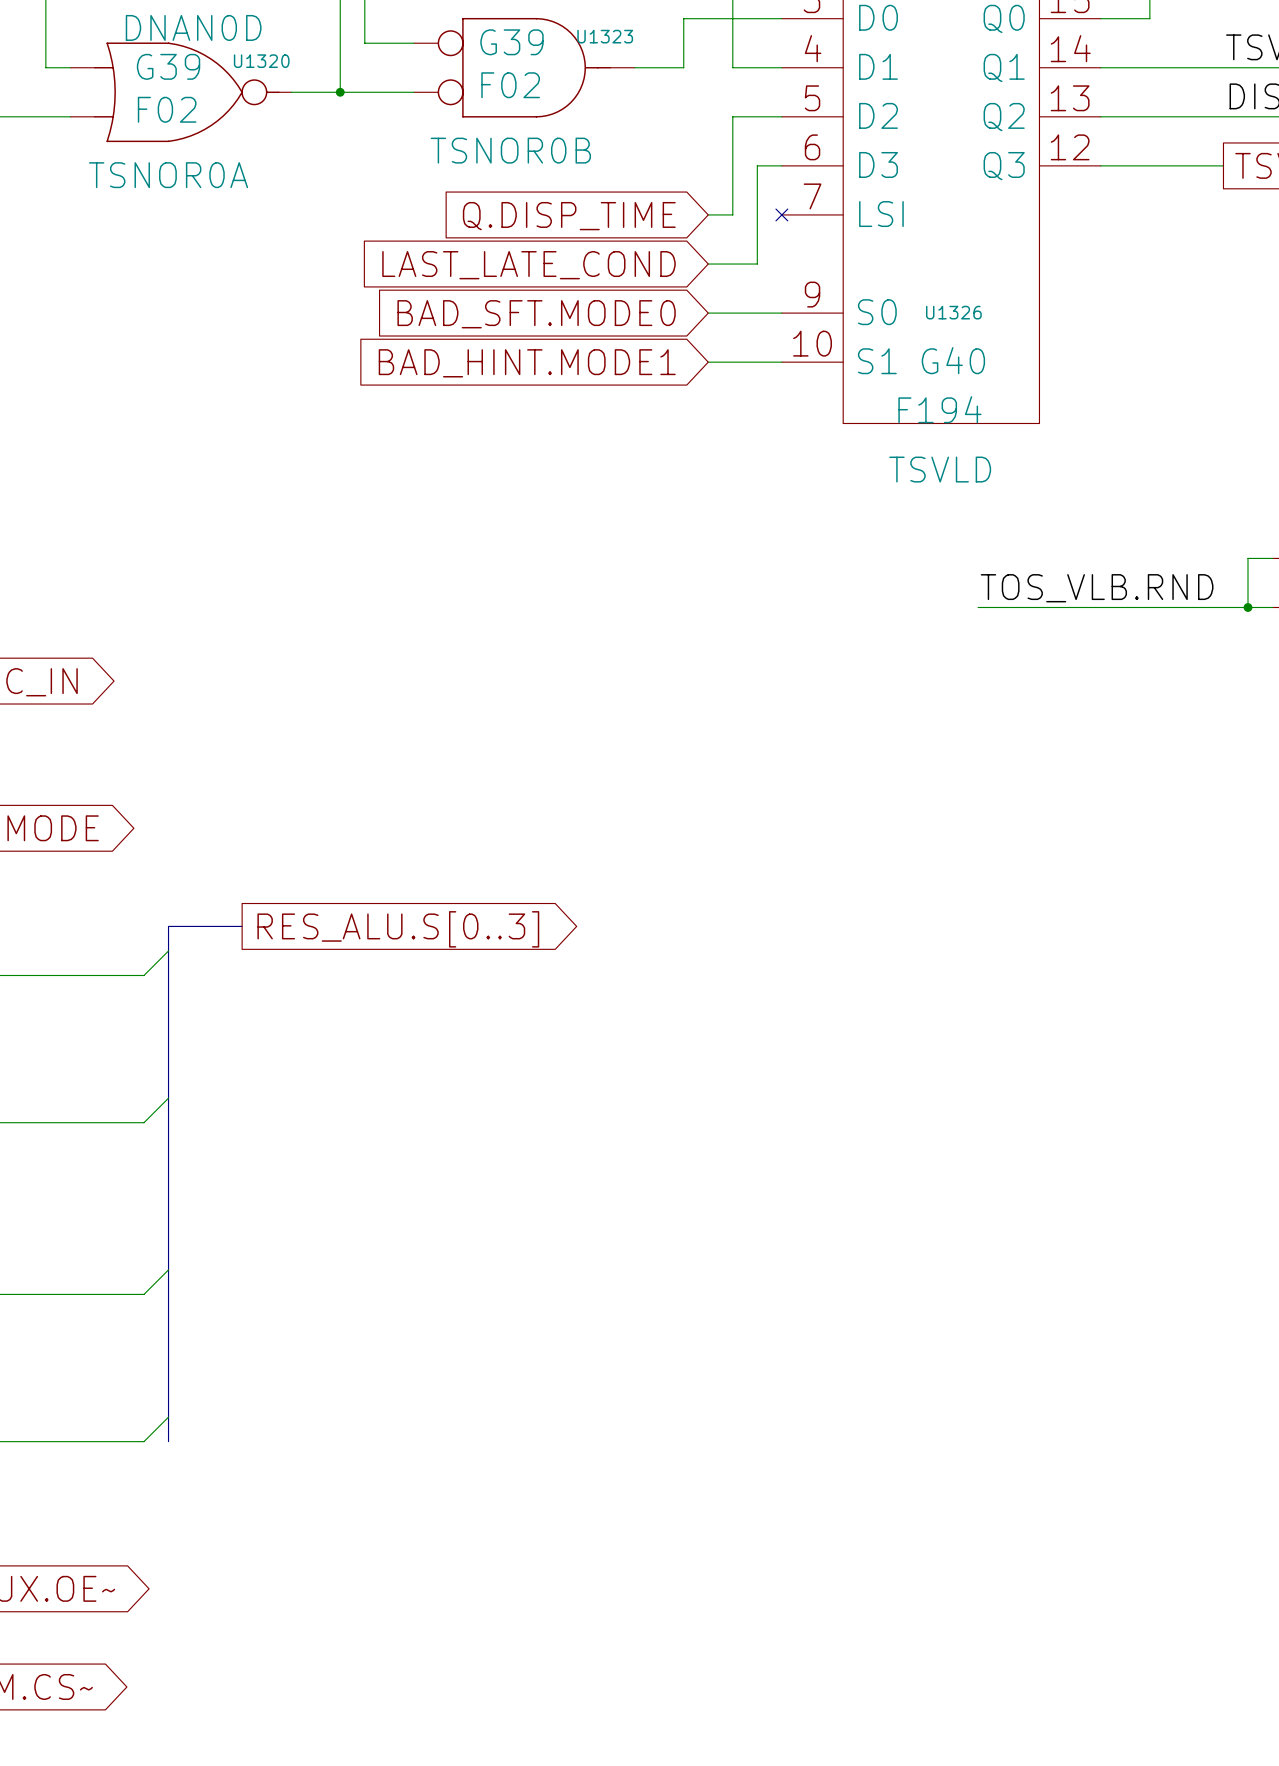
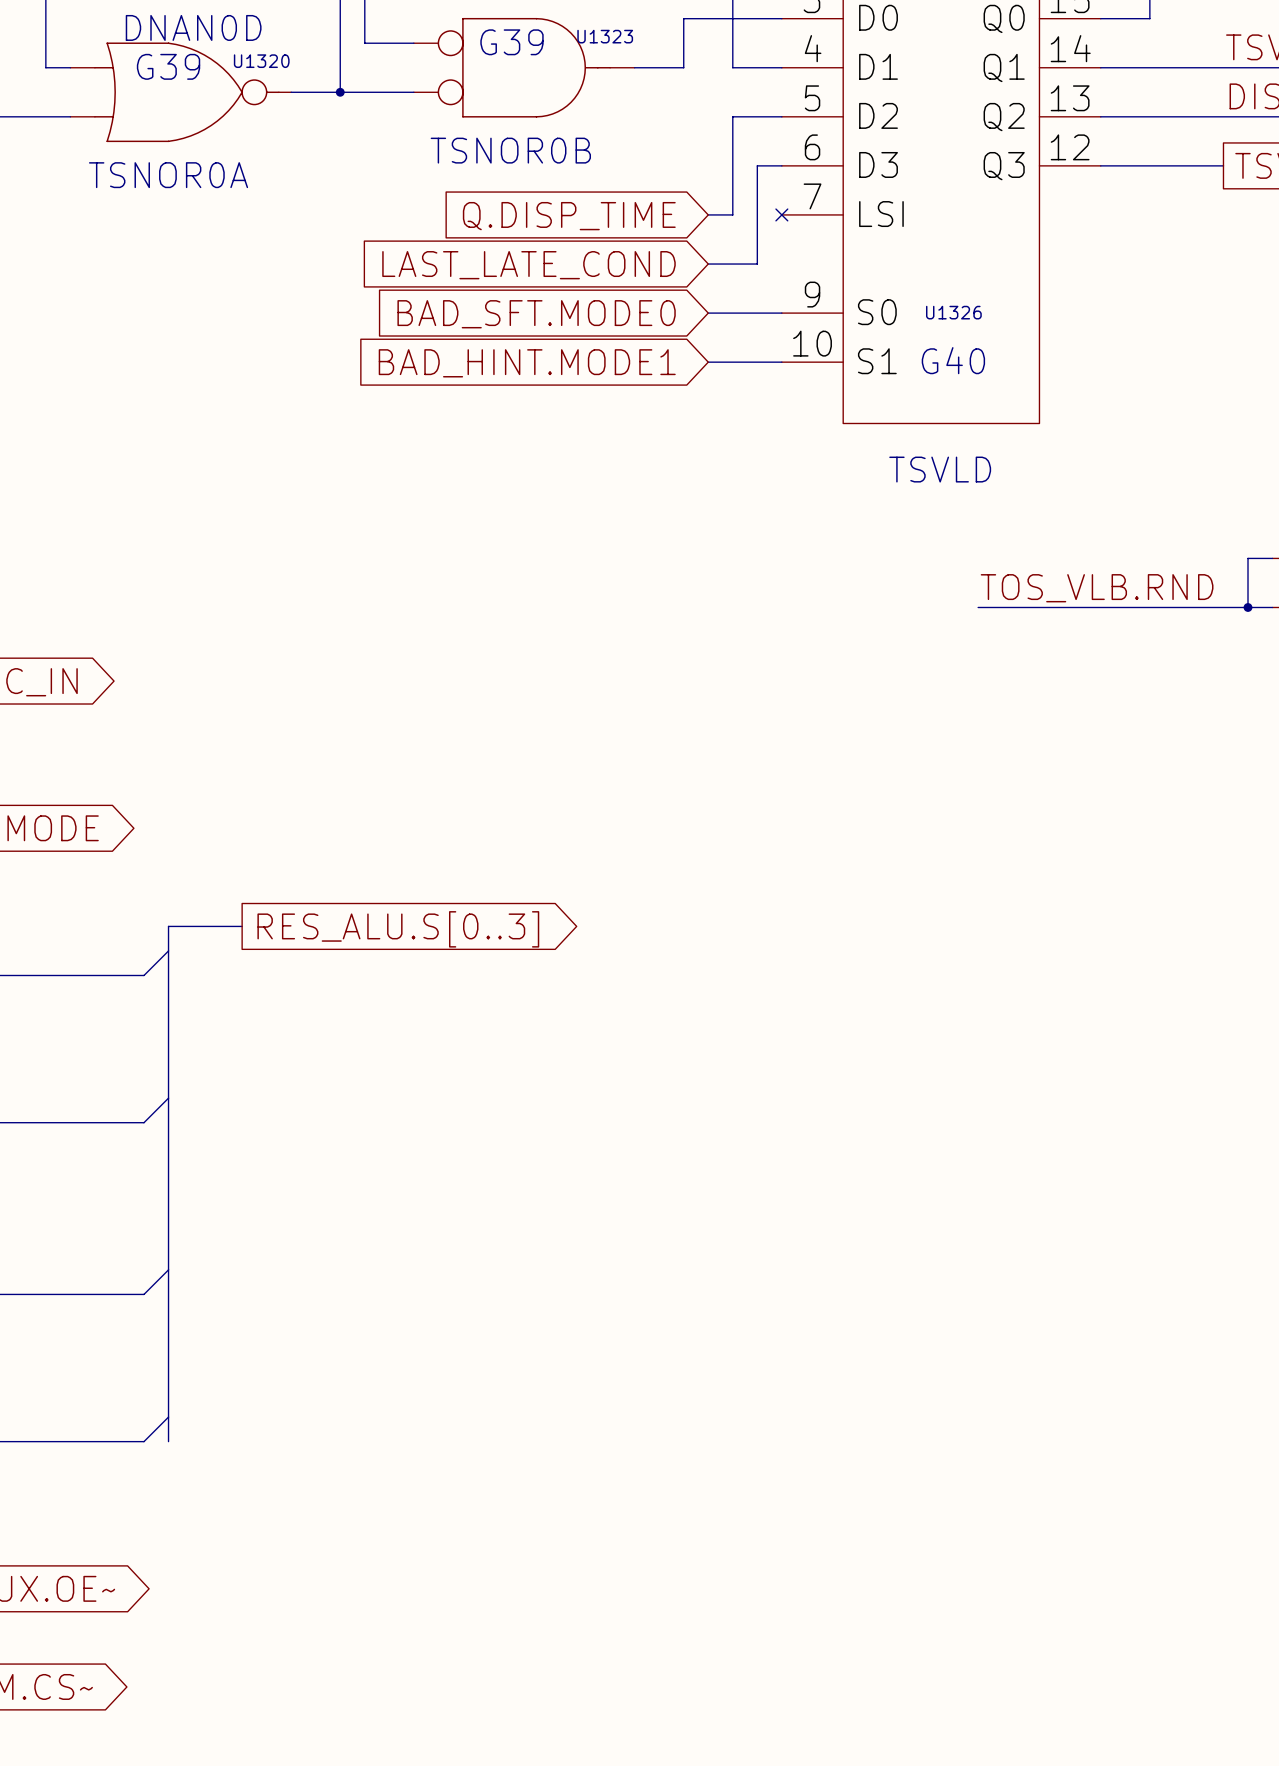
U1323 value: F02 (510, 85) -> none
U1320 value: F02 (167, 109) -> none
U1326 value: F194 (939, 409) -> none

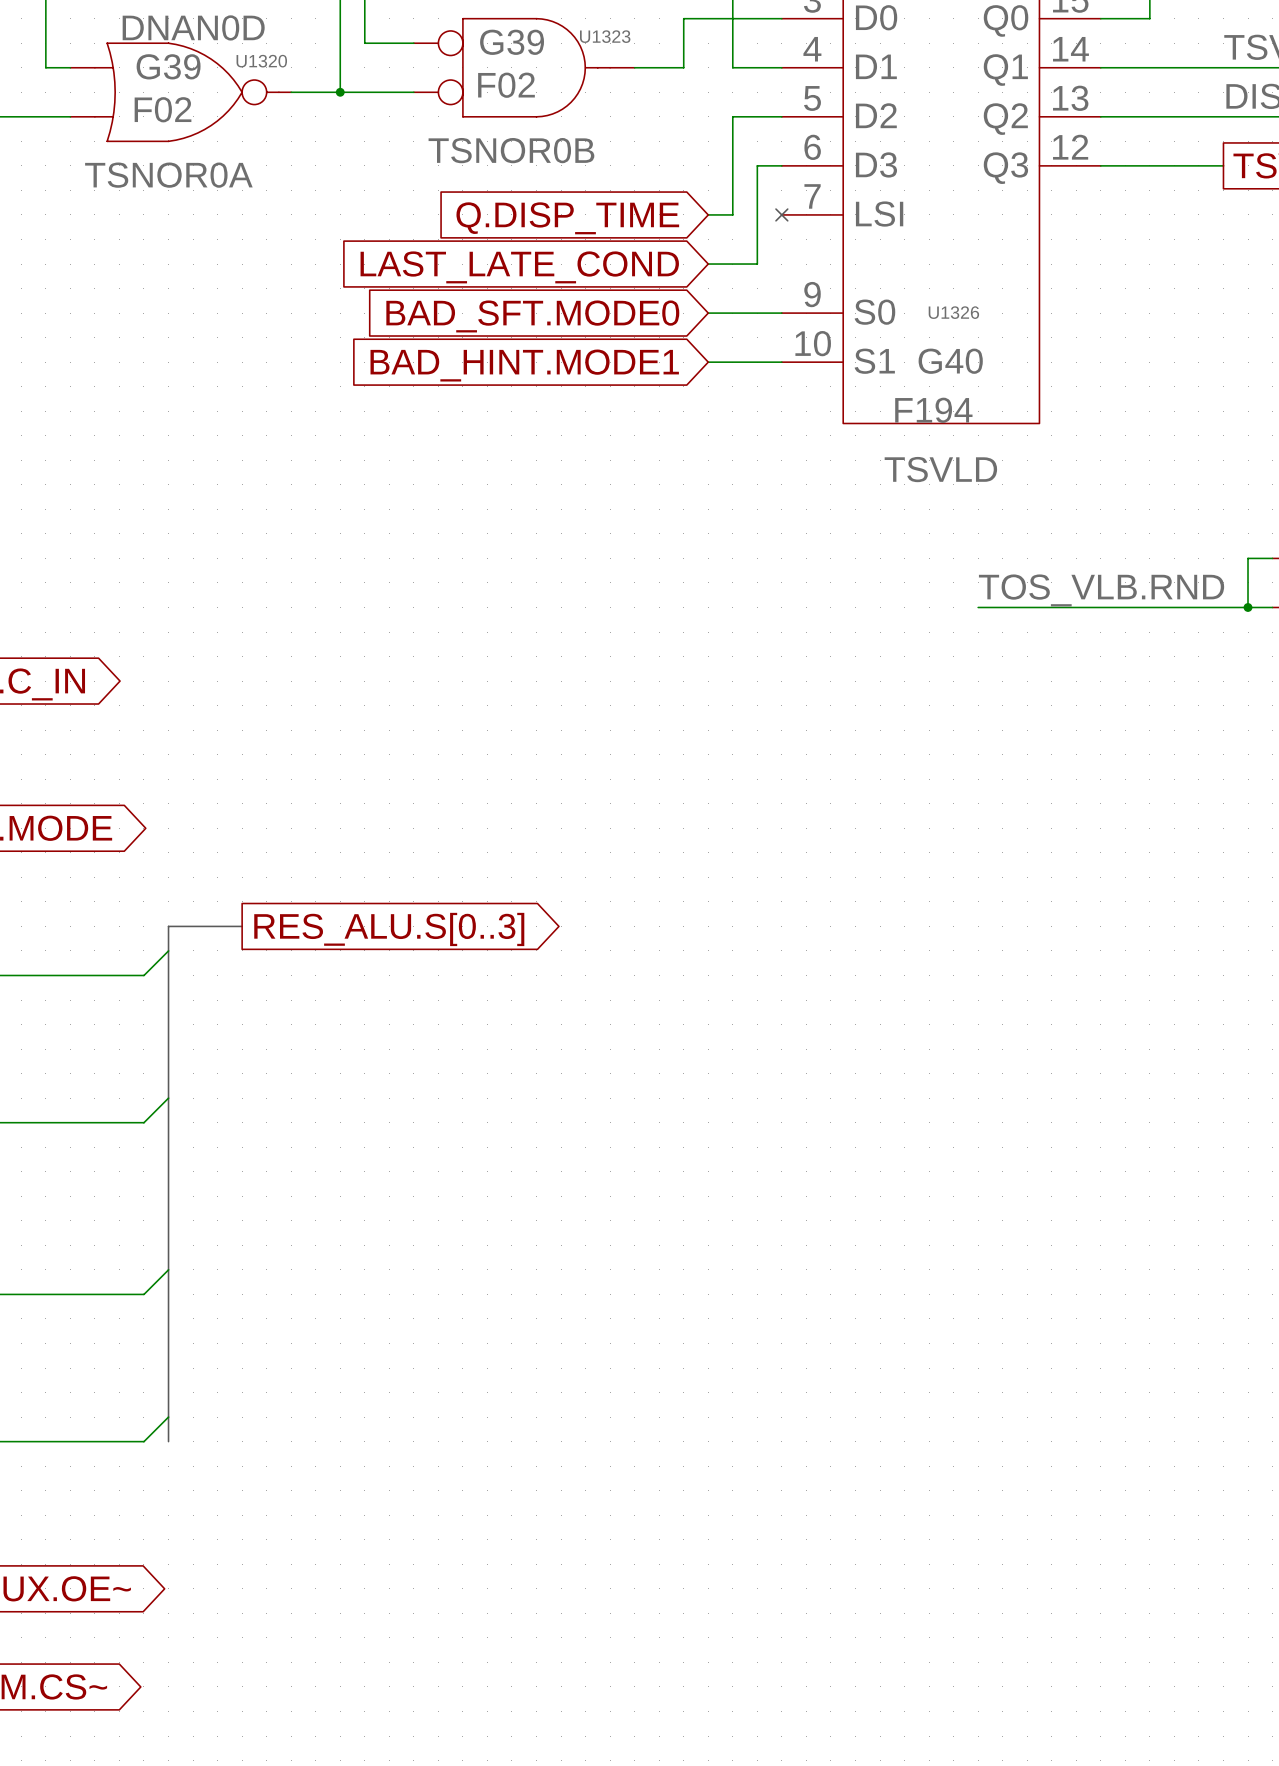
U1323 value: none -> F02 (506, 85)
U1320 value: none -> F02 (163, 109)
U1326 value: none -> F194 (933, 410)

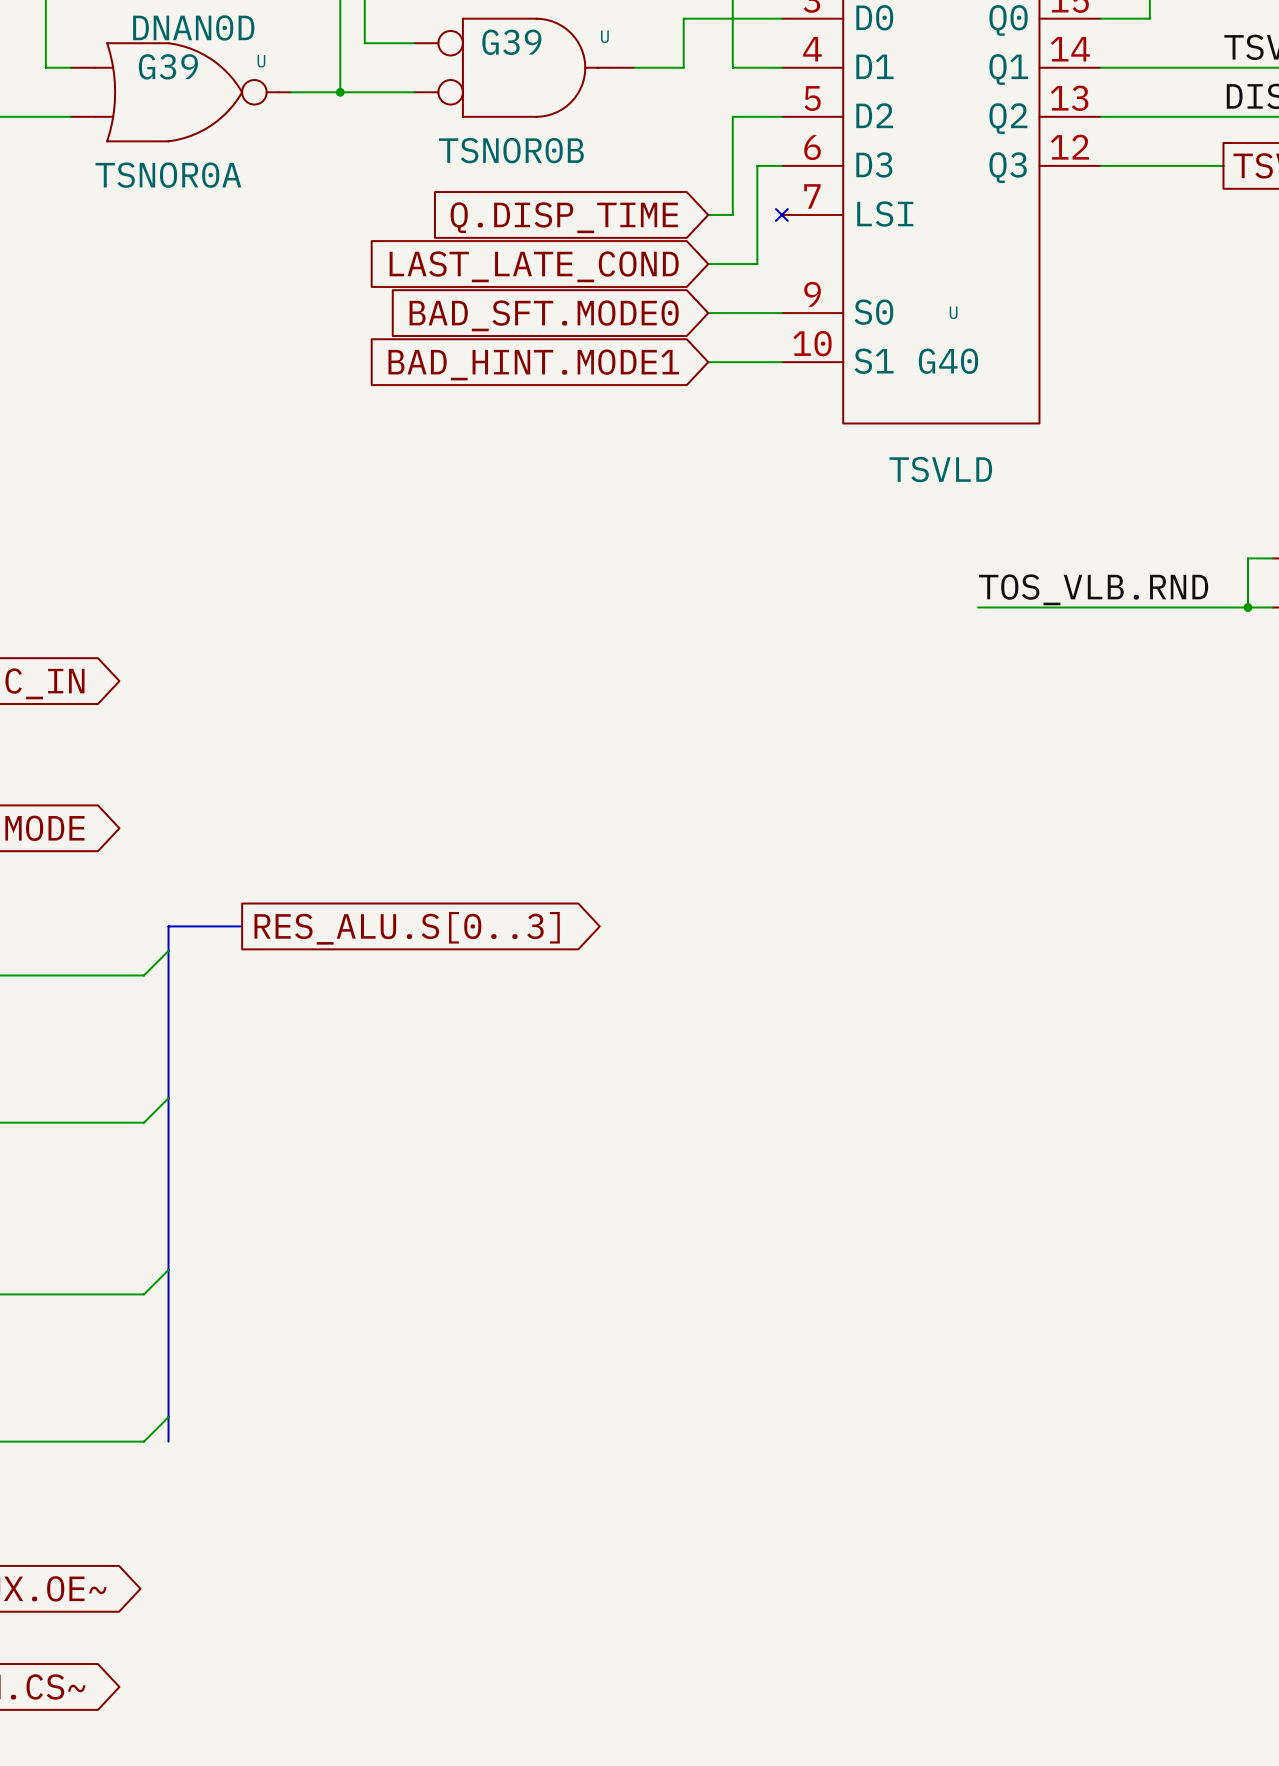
U1323 name: U1323 (605, 36) -> U (604, 36)
U1320 name: U1320 (261, 61) -> U (261, 61)
U1323 value: F02 (506, 85) -> none
U1320 value: F02 (163, 109) -> none
U1326 name: U1326 (953, 312) -> U (953, 312)
U1326 value: F194 (933, 410) -> none

